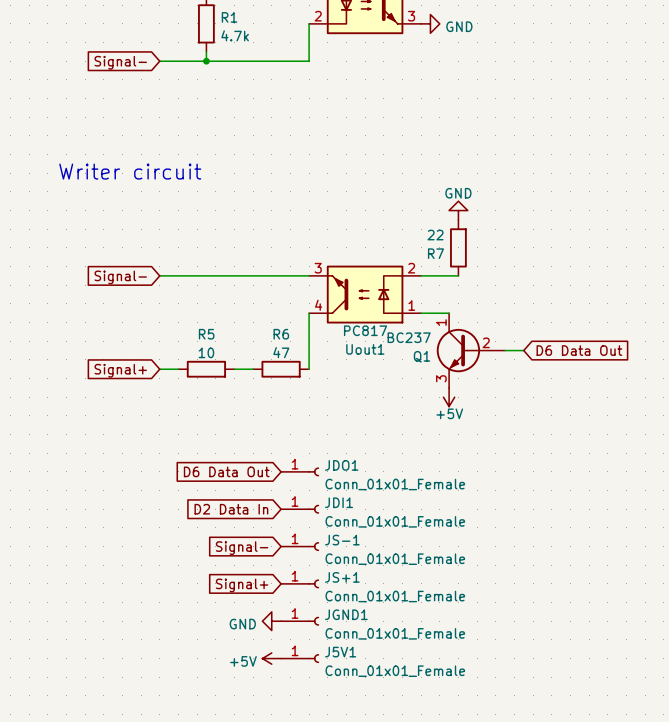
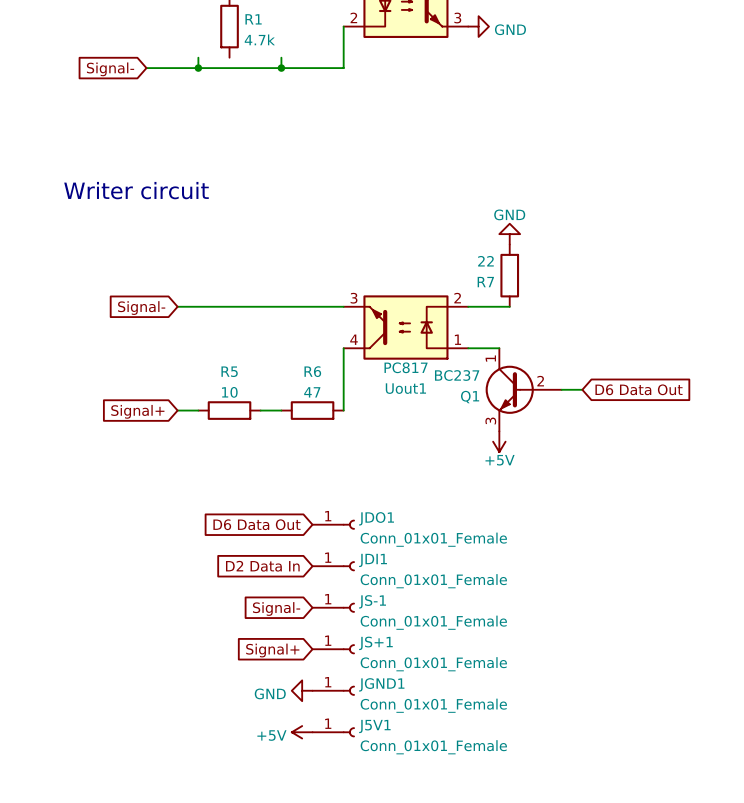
wire: (206, 51) (206, 61) -> (198, 57) (198, 68)
wire: none -> (281, 57) (281, 68)
wire: none -> (146, 68) (177, 68)
junction: none -> (198, 68)
junction: (206, 61) -> none
junction: none -> (281, 68)
global label position: Signal- (120, 62) -> Signal- (110, 69)

